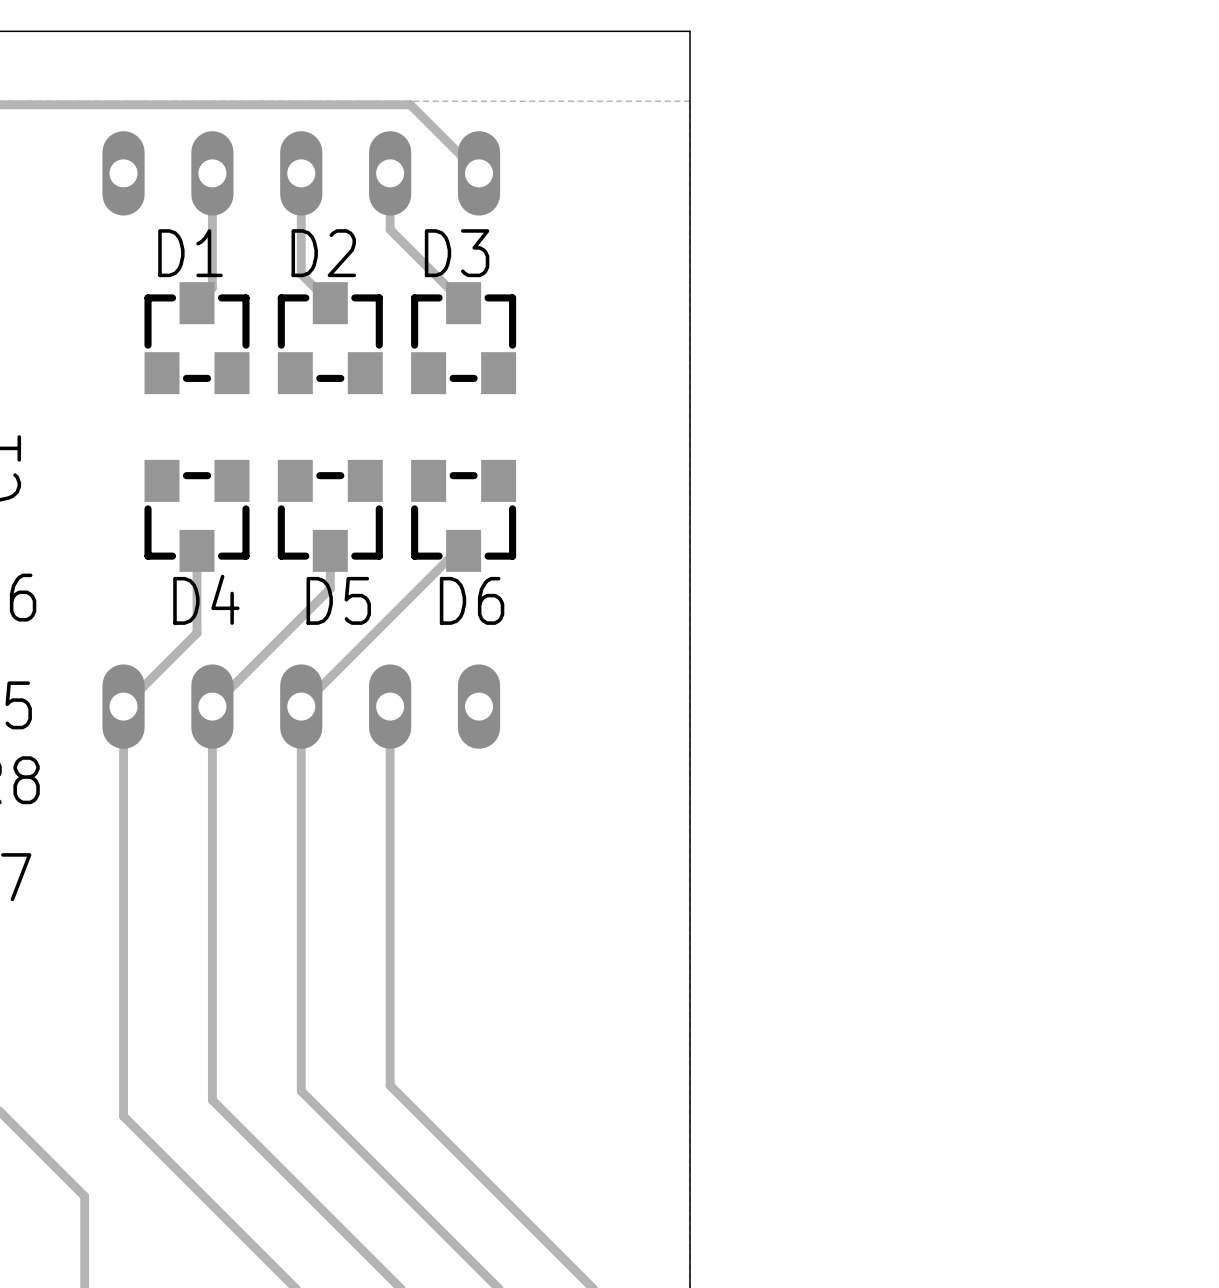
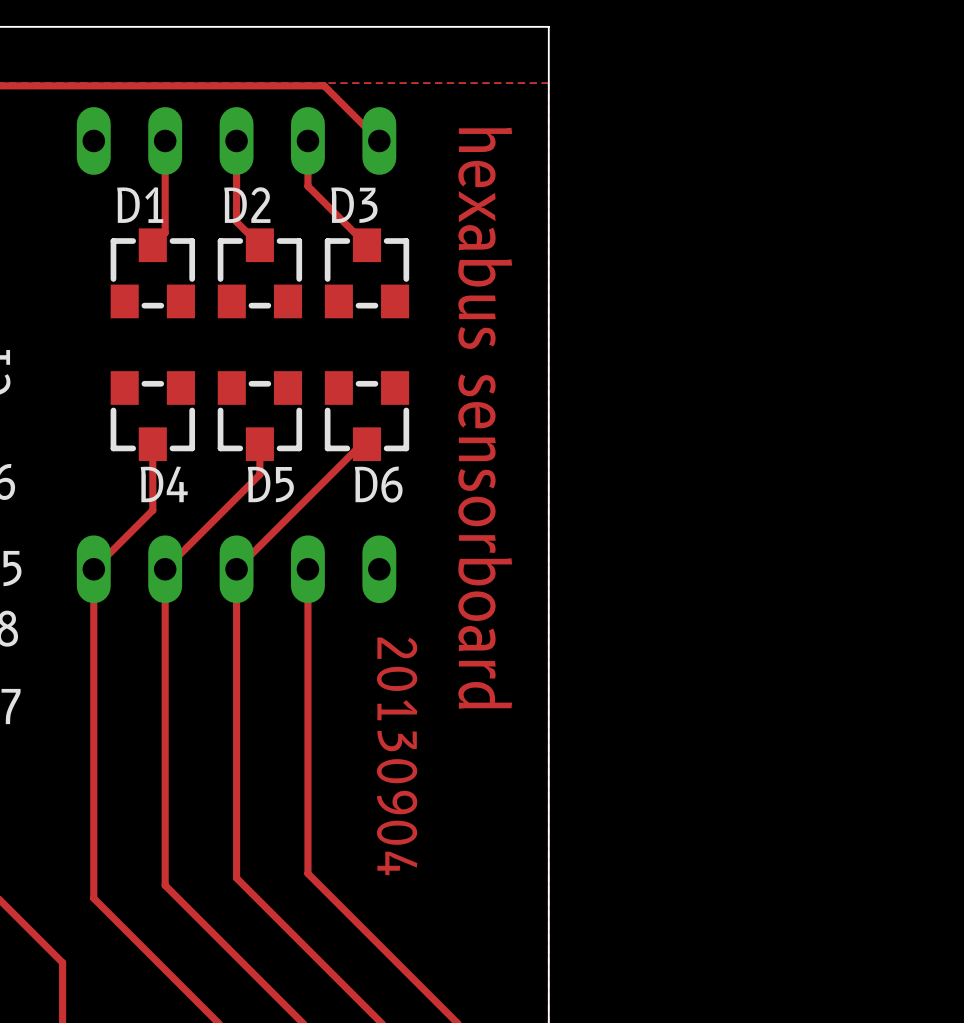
text: none -> hexabus sensorboard (485, 418)
text: none -> 20130904 (397, 756)

